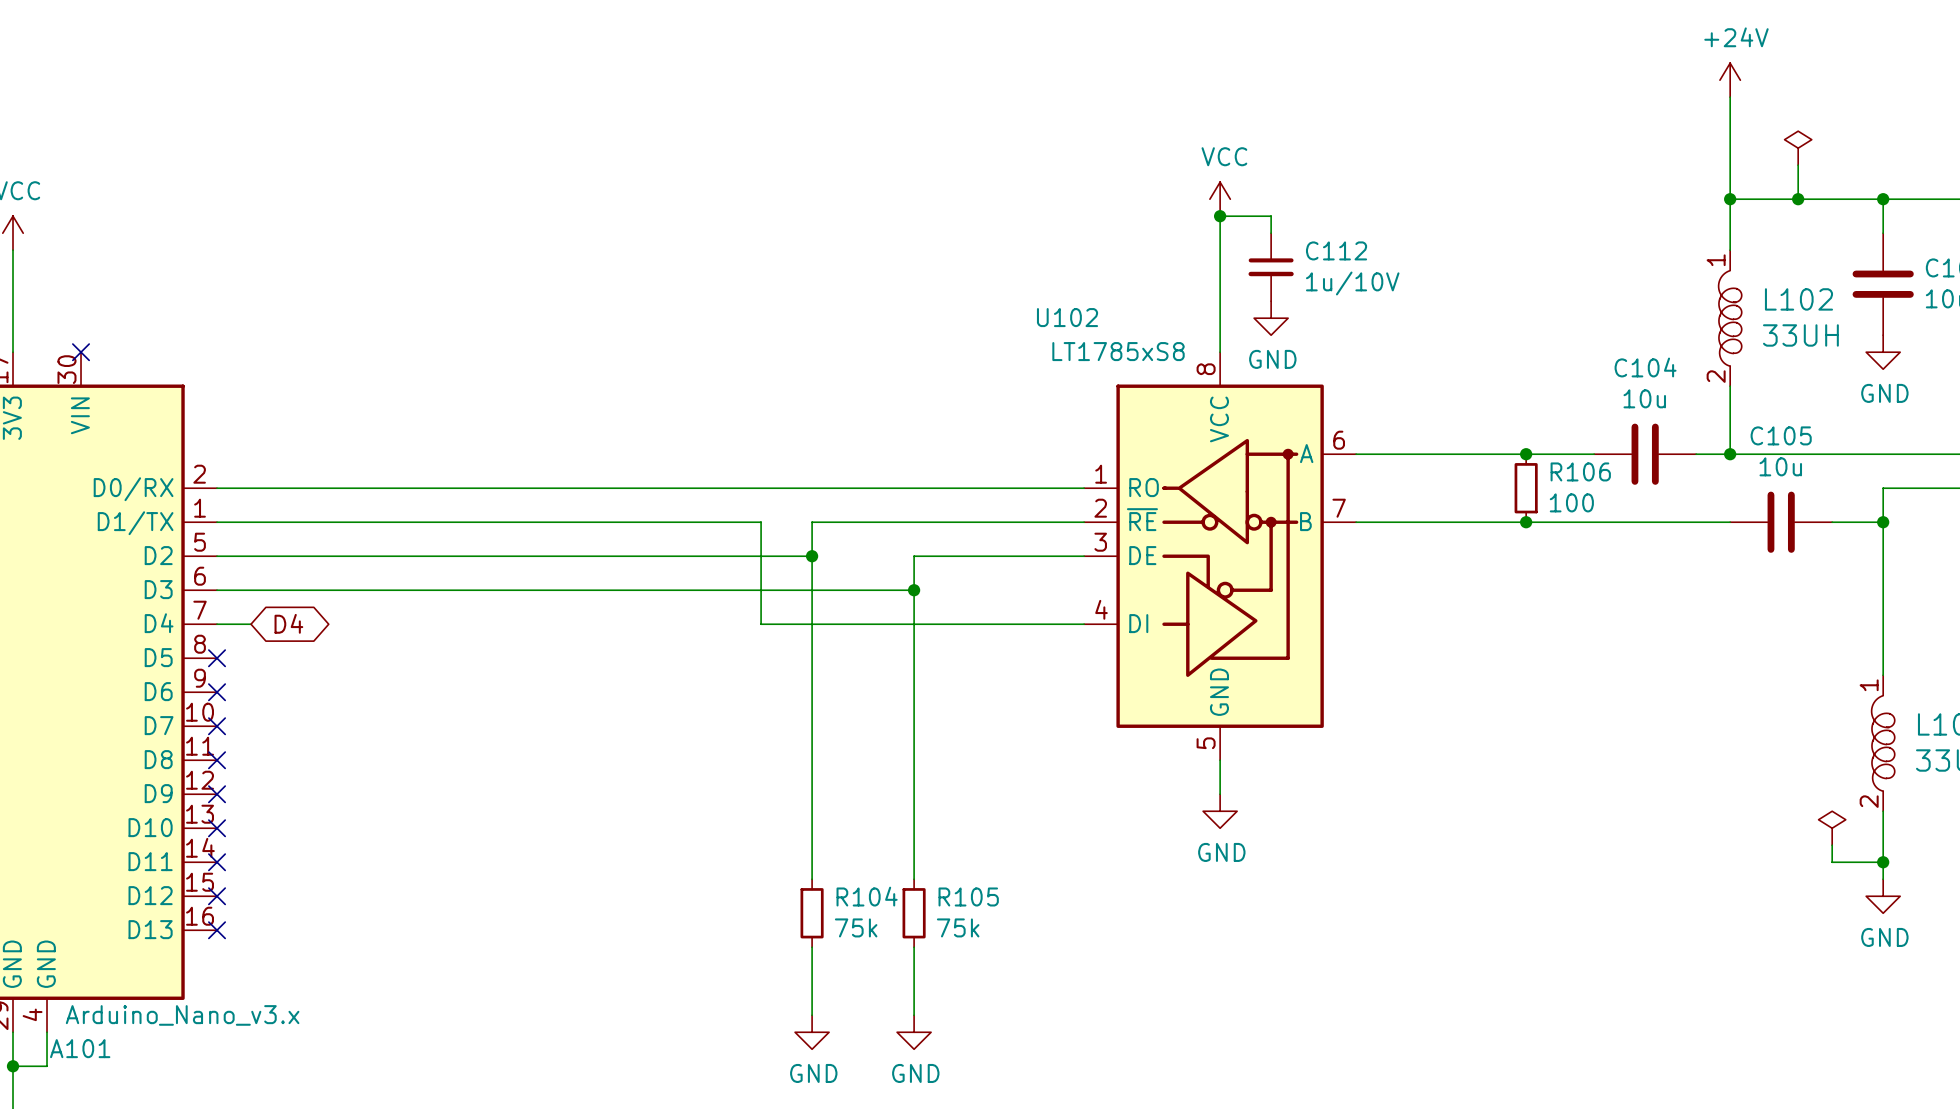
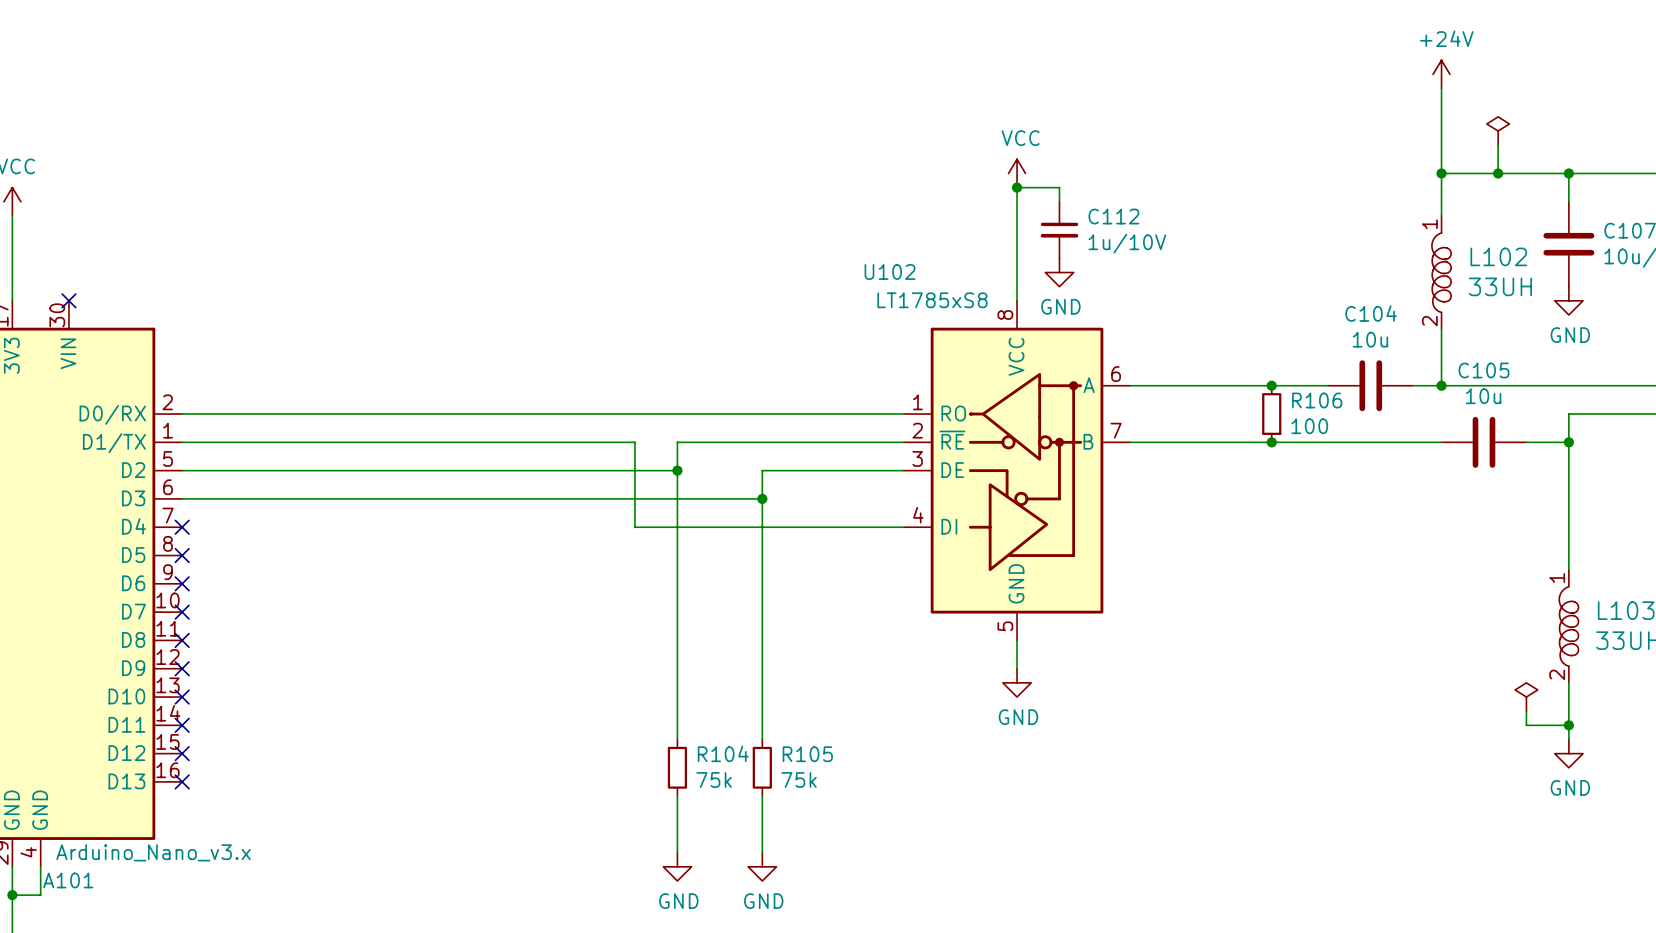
global label: D4 (288, 623) -> none
wire: (217, 624) (251, 624) -> none
no-connect mark: none -> (182, 527)

